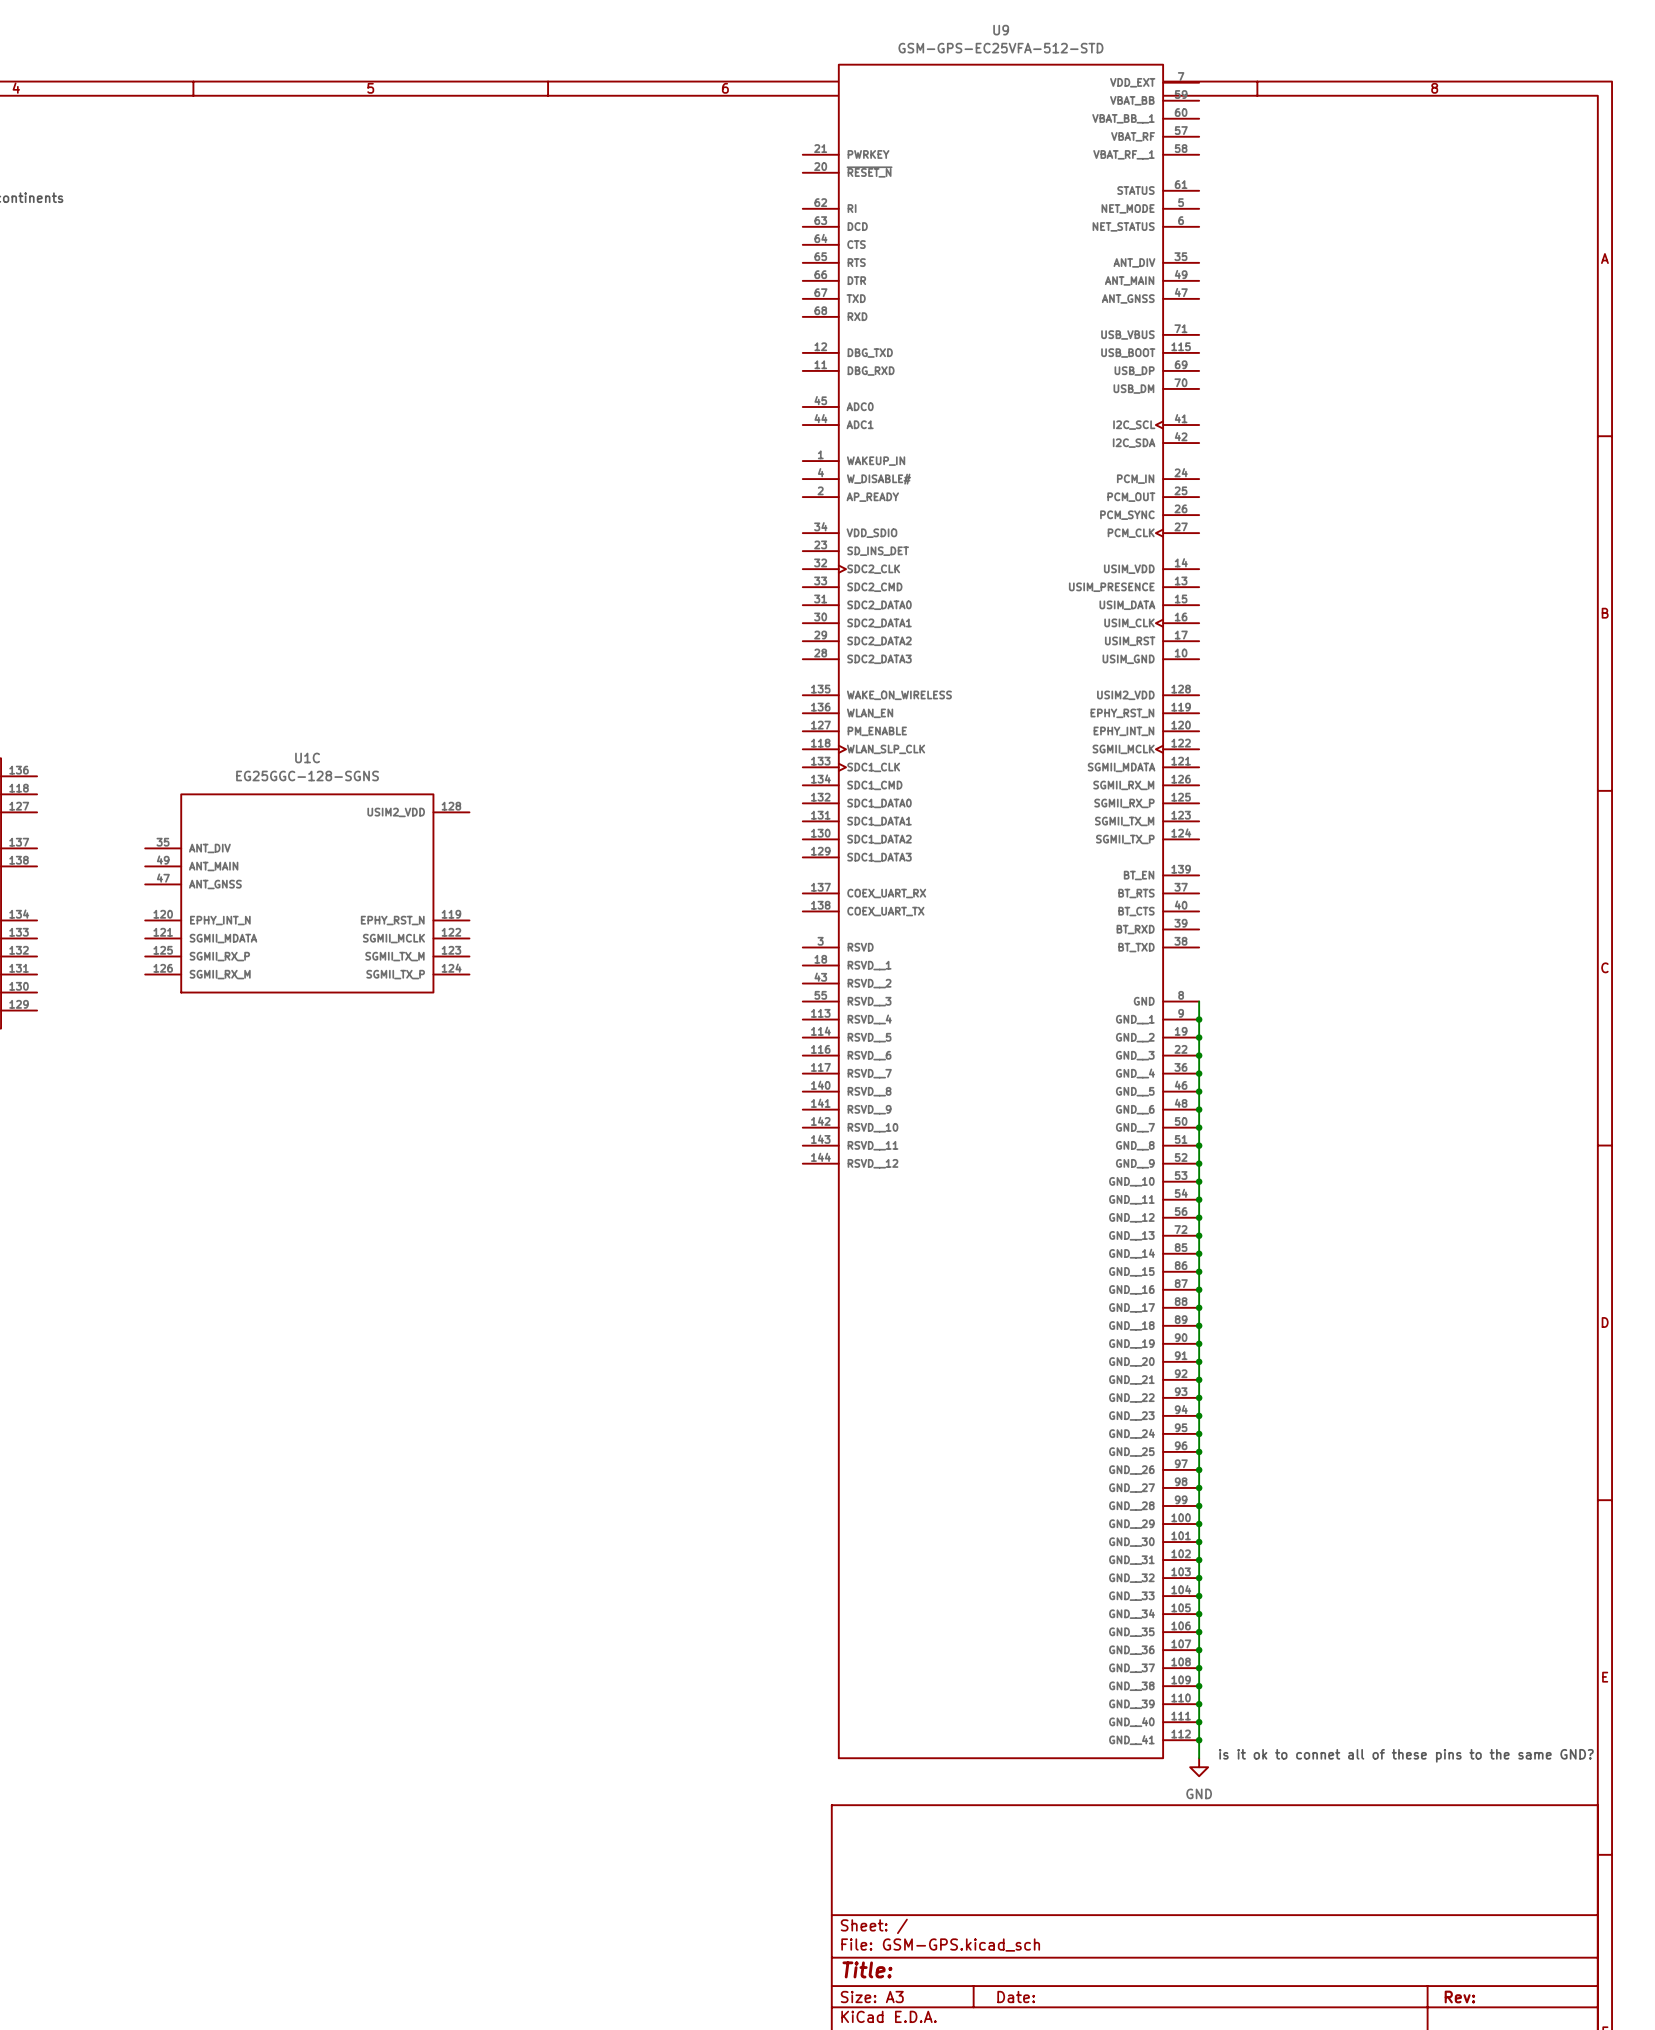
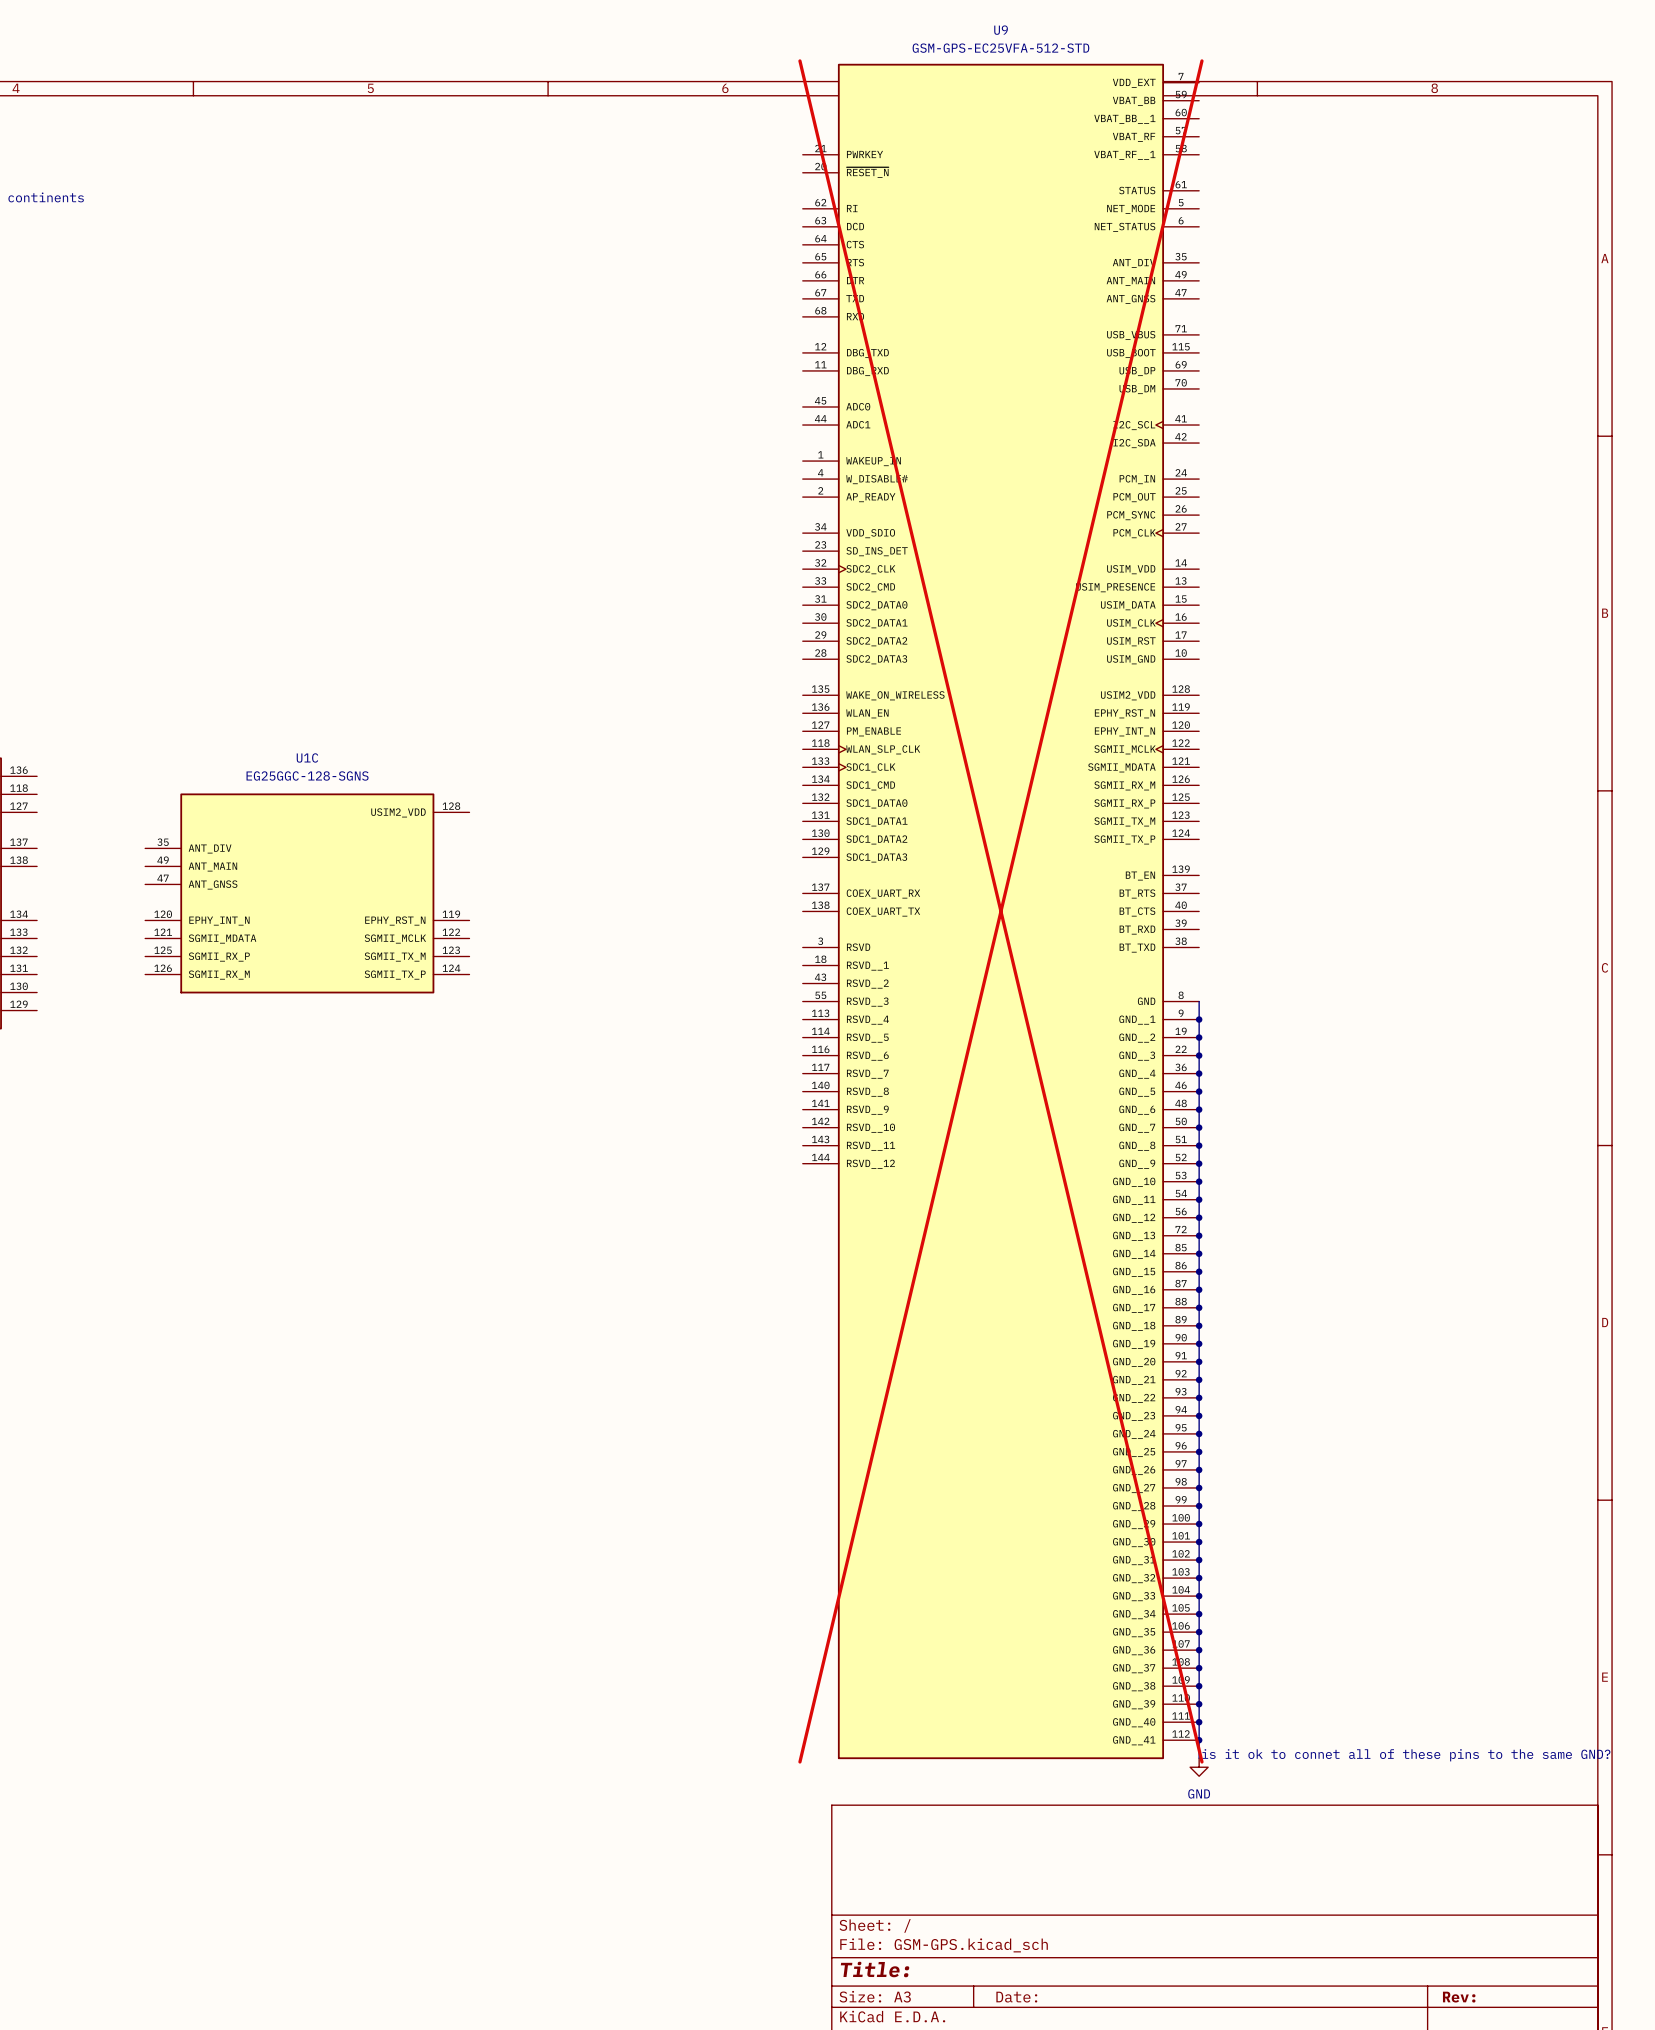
U9 do-not-place cross: none -> (1000, 911)

